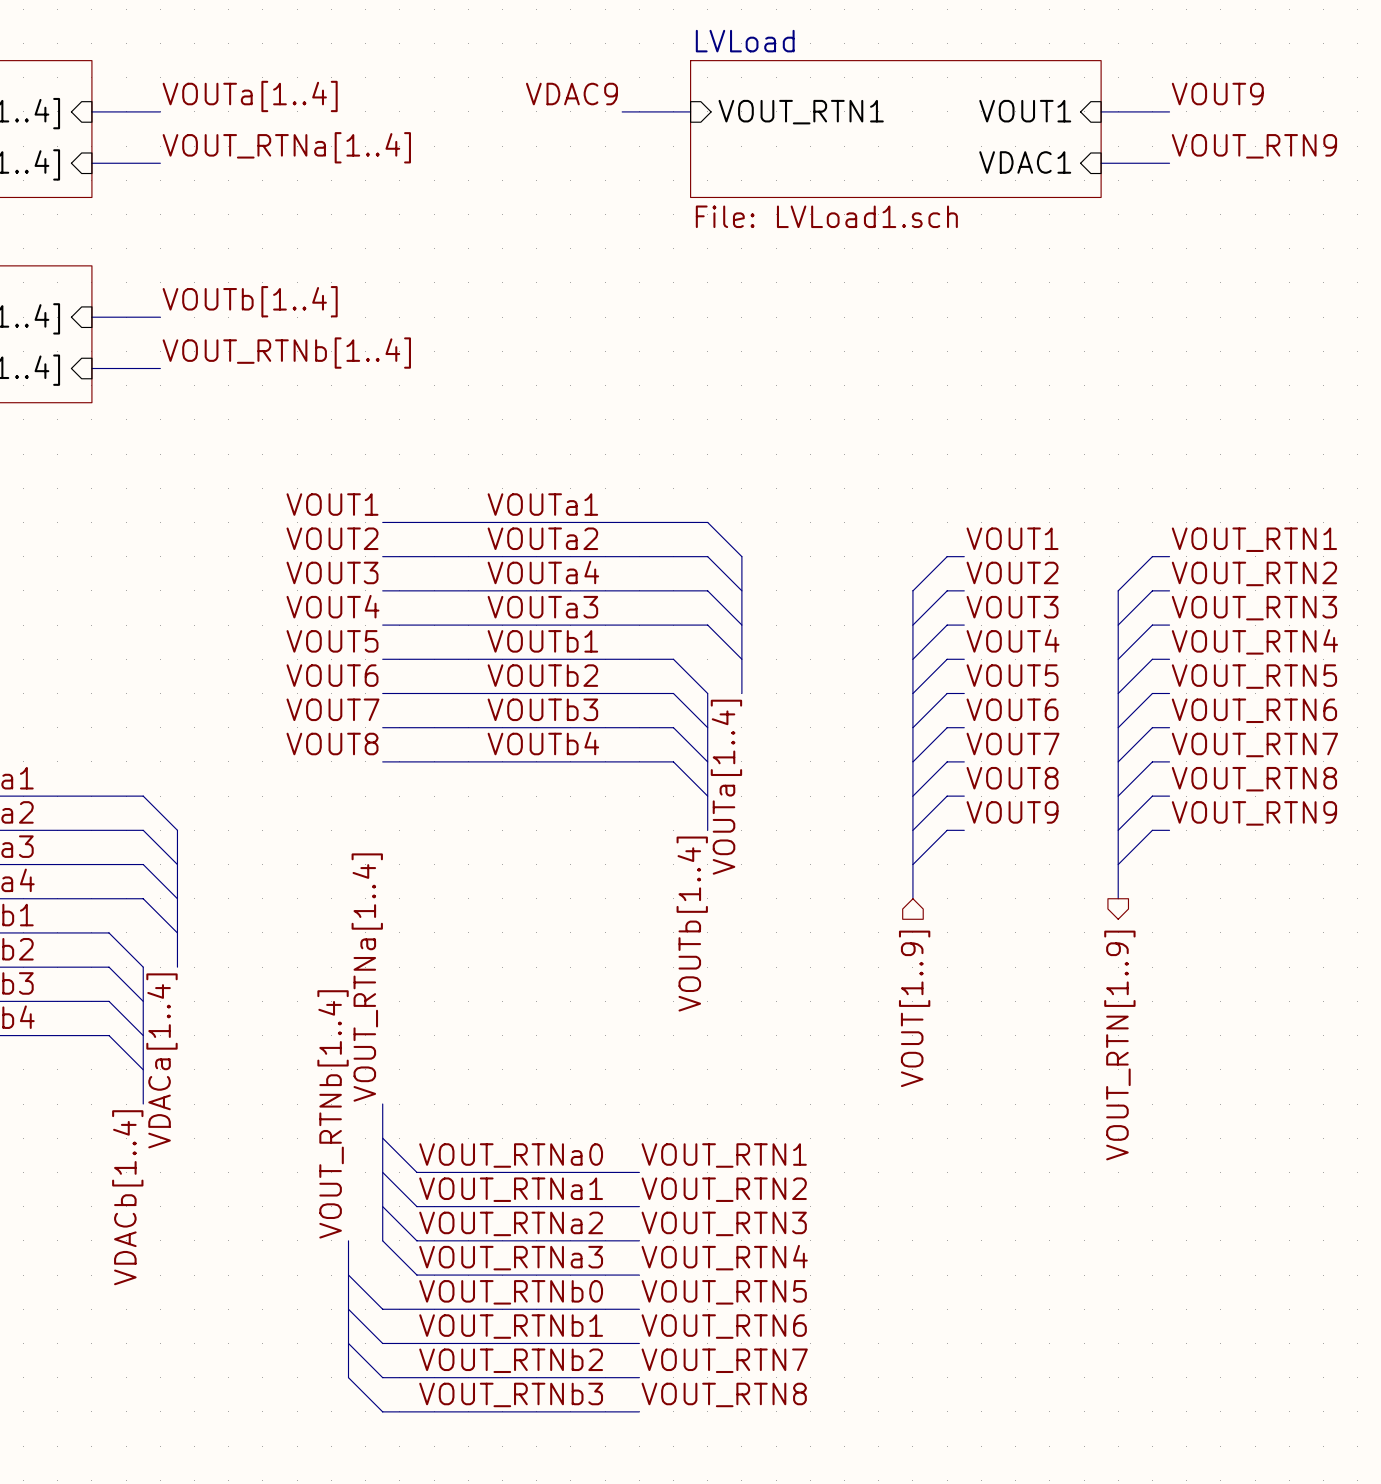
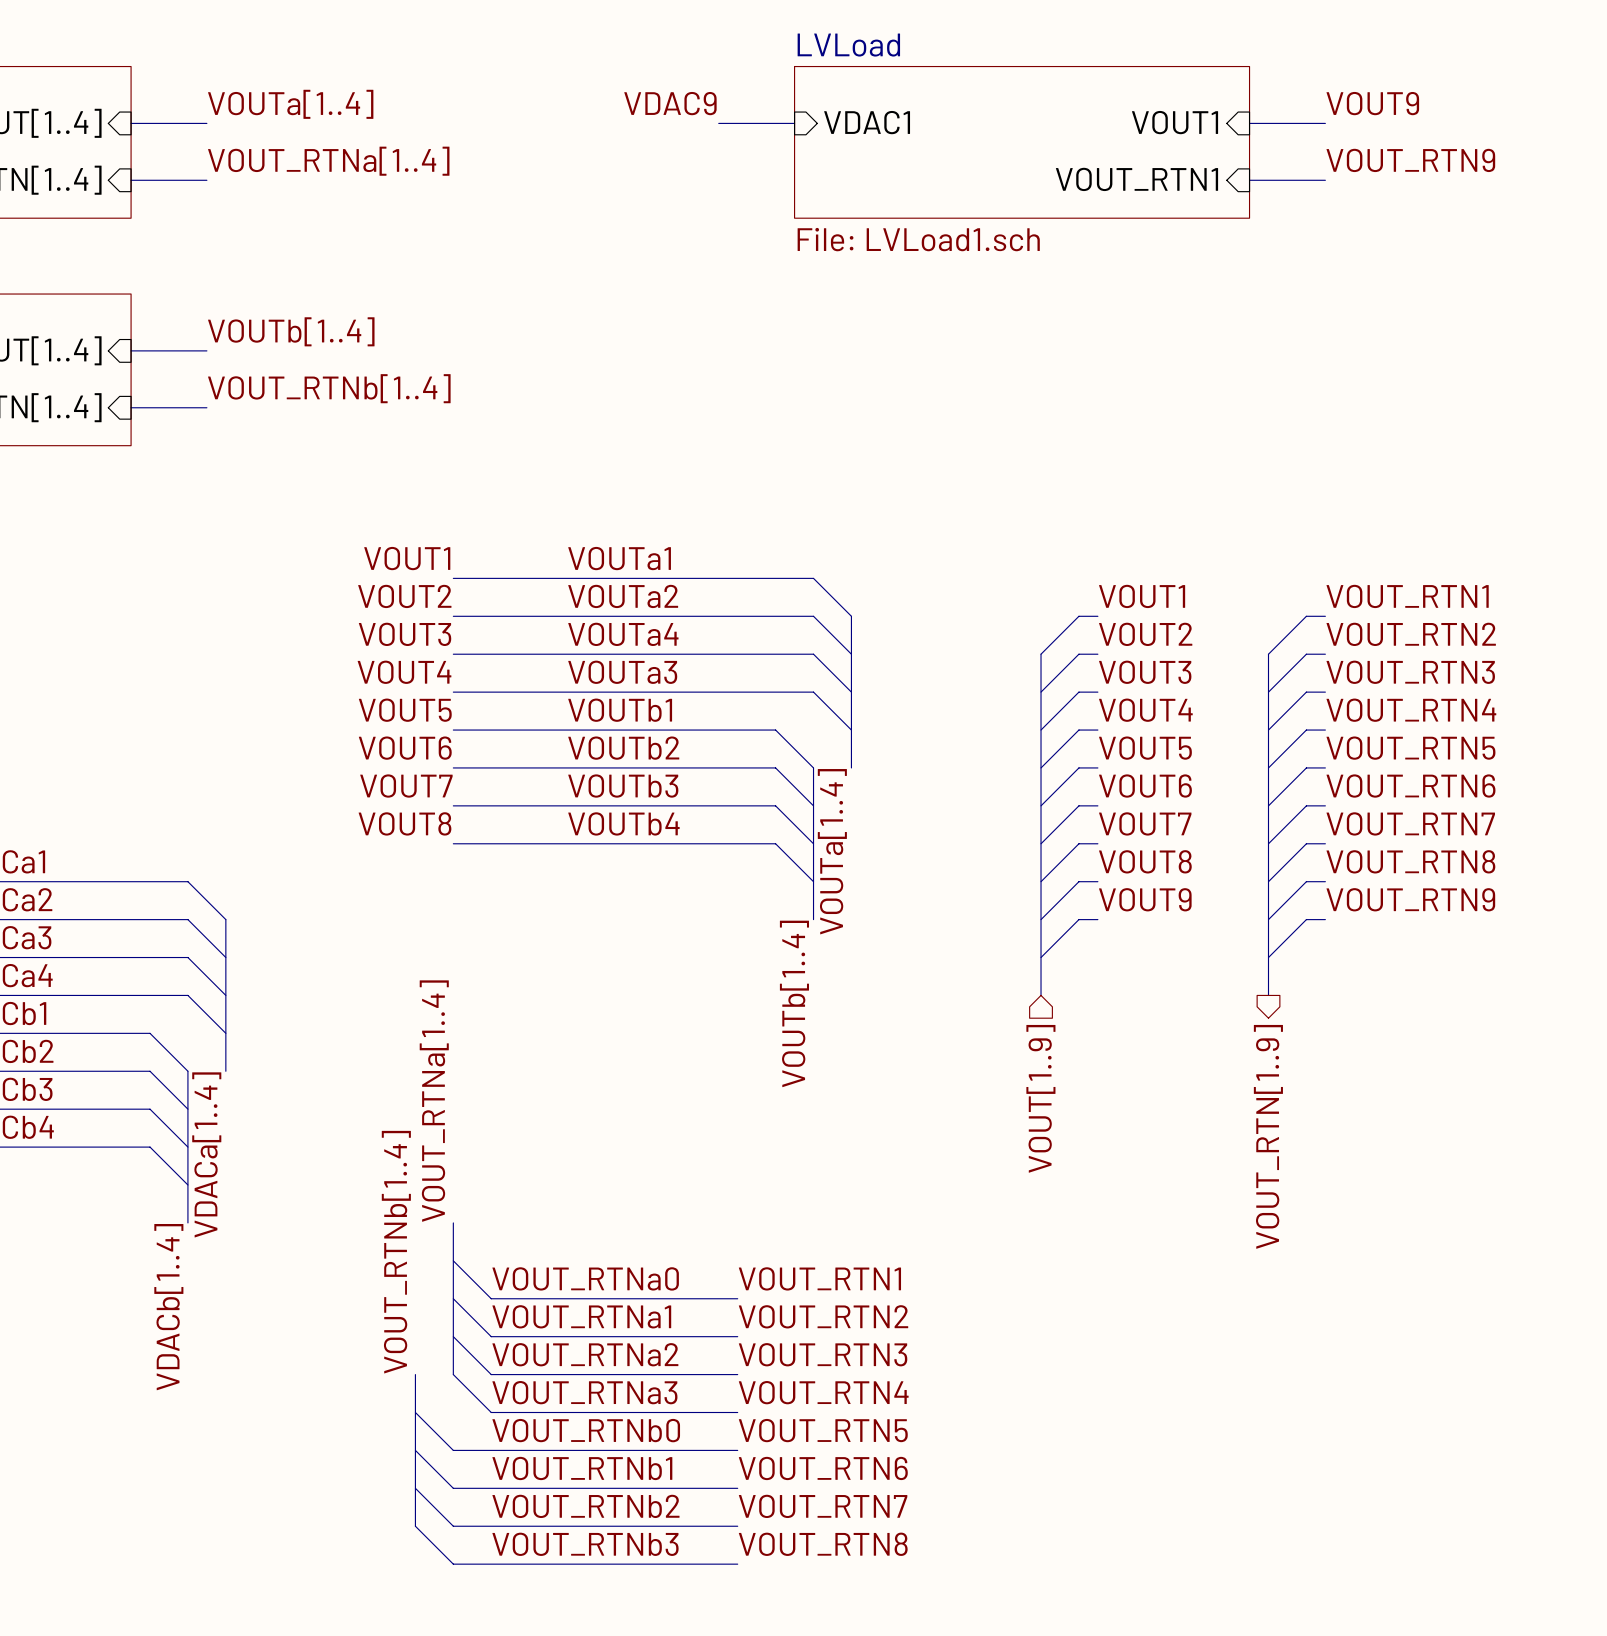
sheet pin: VOUT_RTN1 (801, 112) -> VDAC1 (867, 122)
sheet pin: VDAC1 (1025, 162) -> VOUT_RTN1 (1136, 179)

